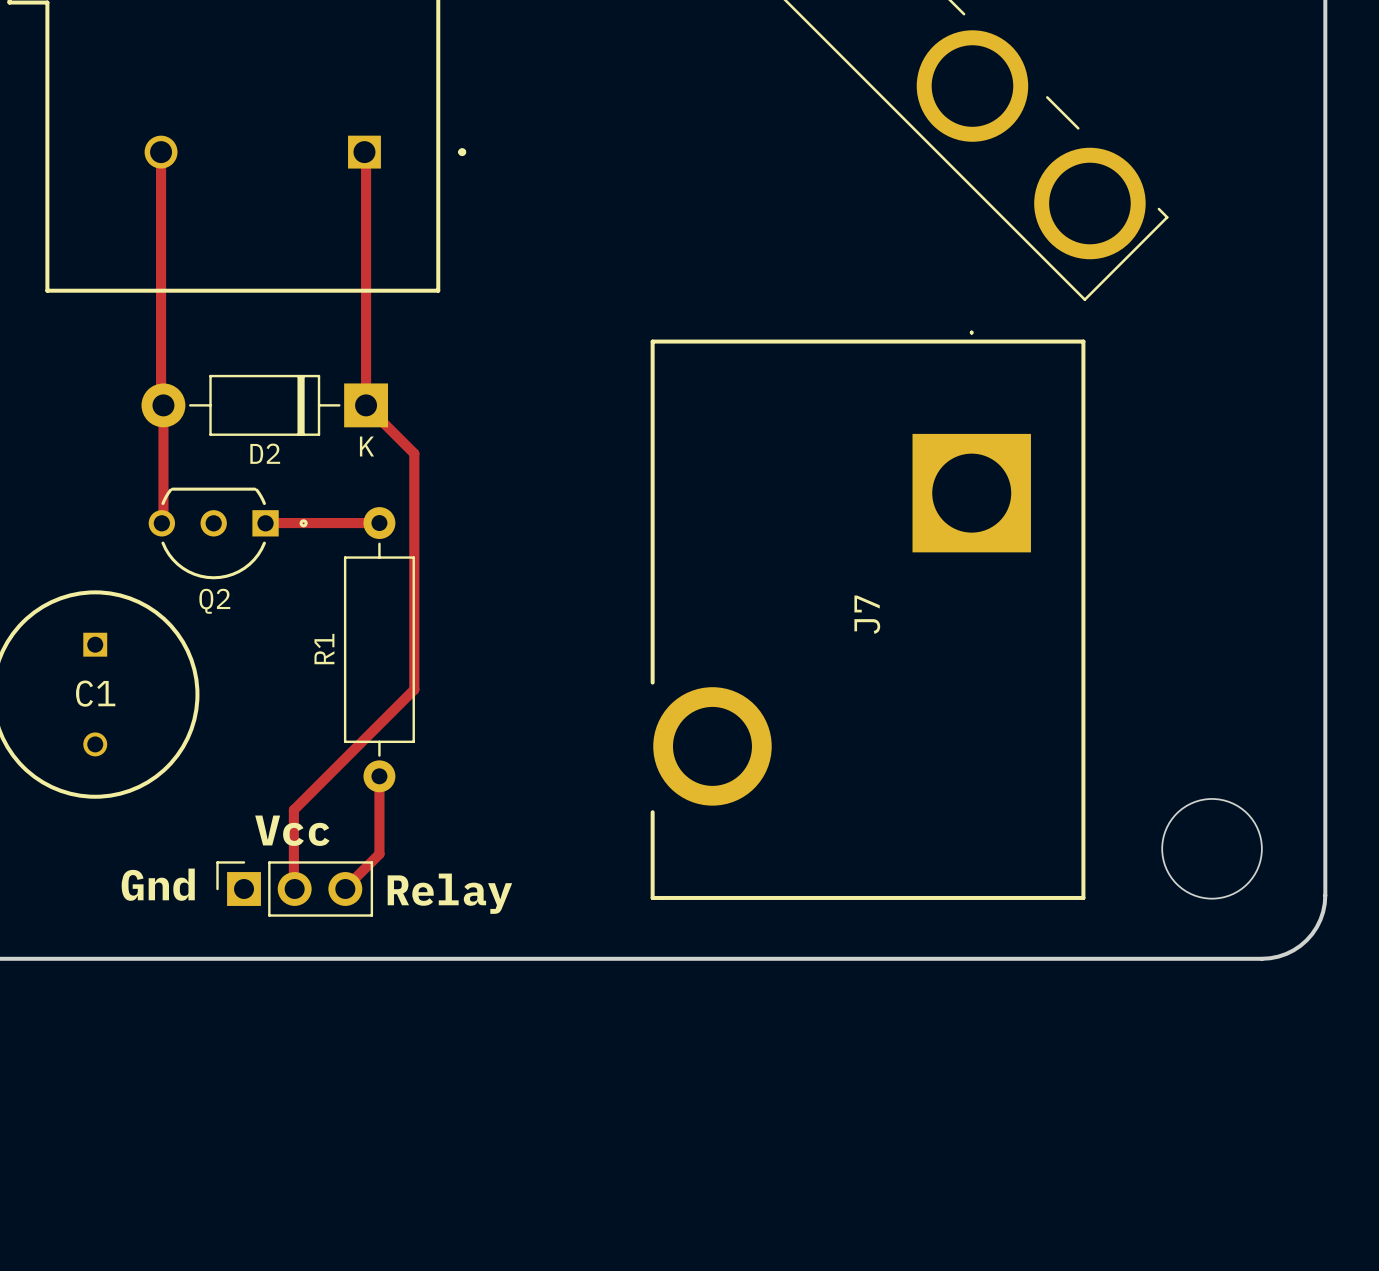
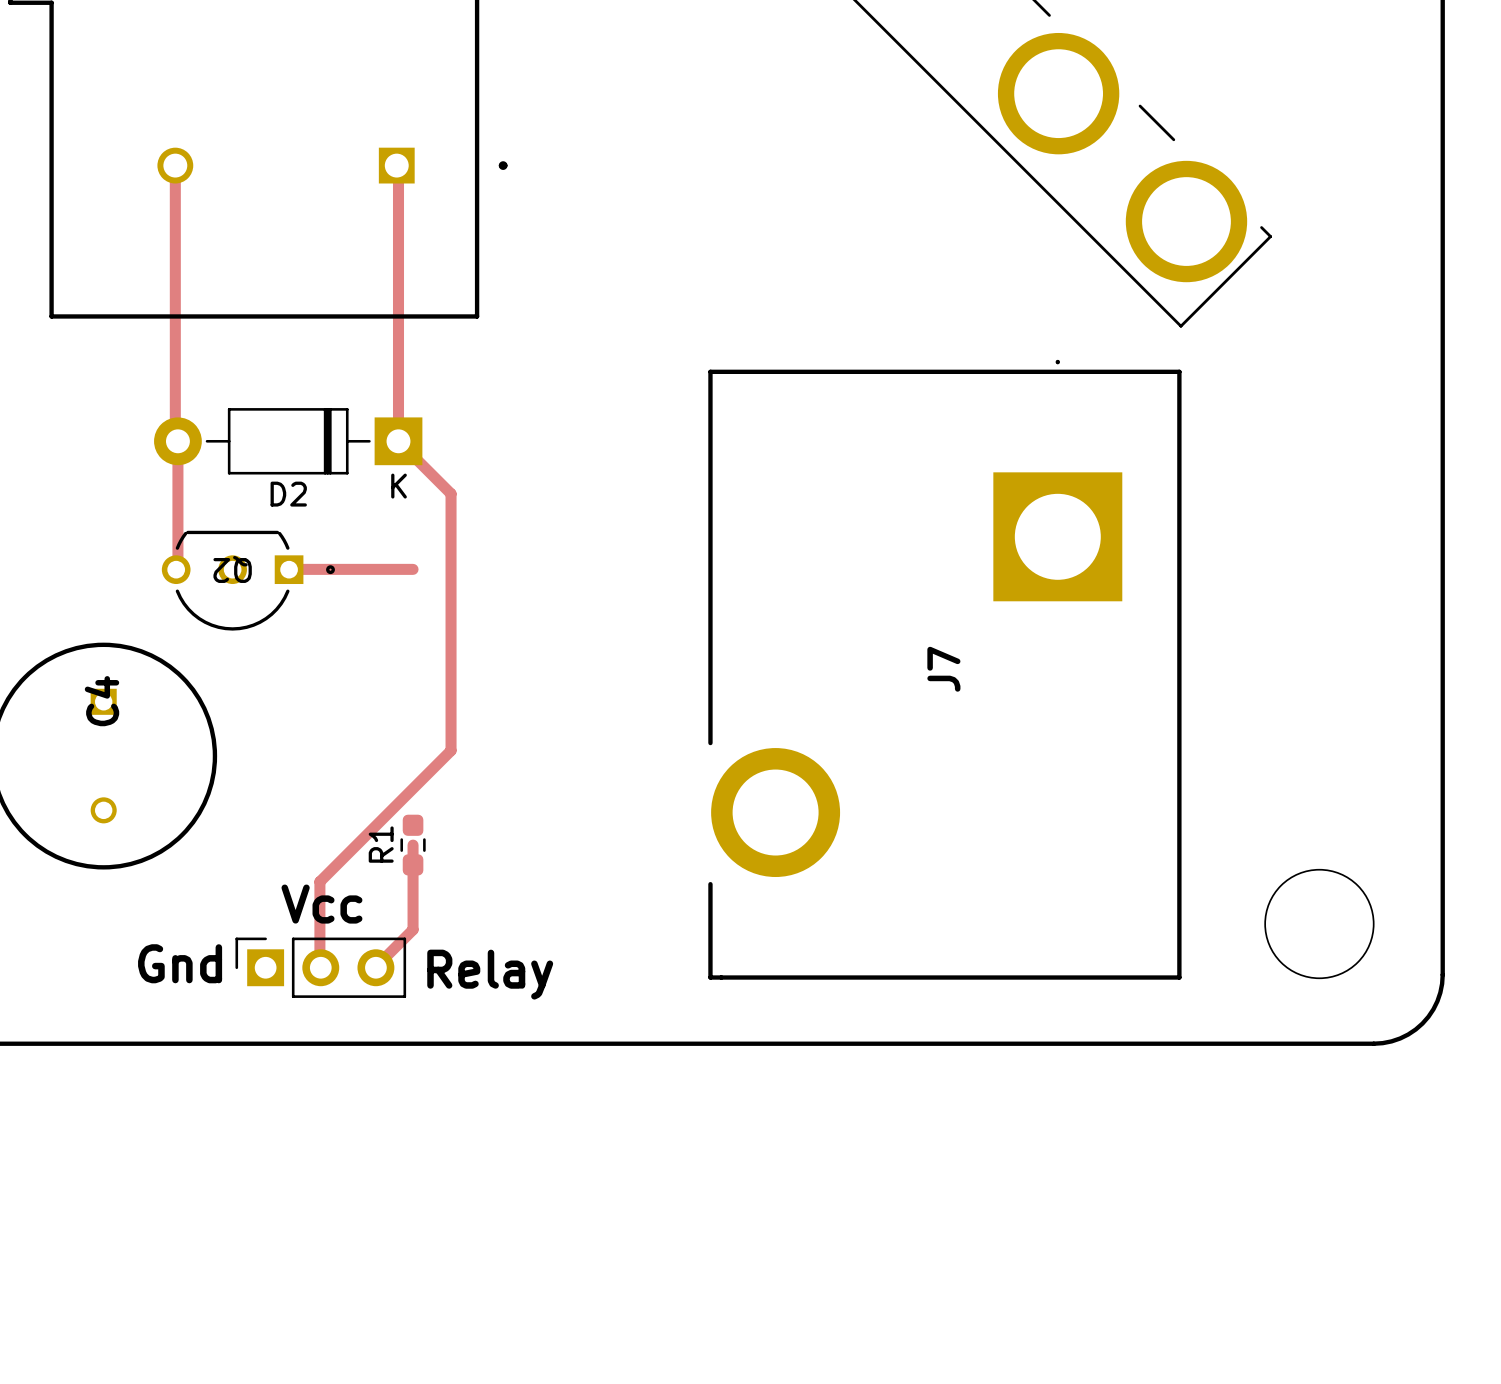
R1 footprint: [343, 507, 415, 793] -> [400, 814, 426, 876]
Q2 name rotation: 0° (214, 601) -> 180° (232, 569)
Q2 name position: Q2 (214, 601) -> Q2 (232, 569)
C1 name: C1 (95, 693) -> C4 (102, 701)

